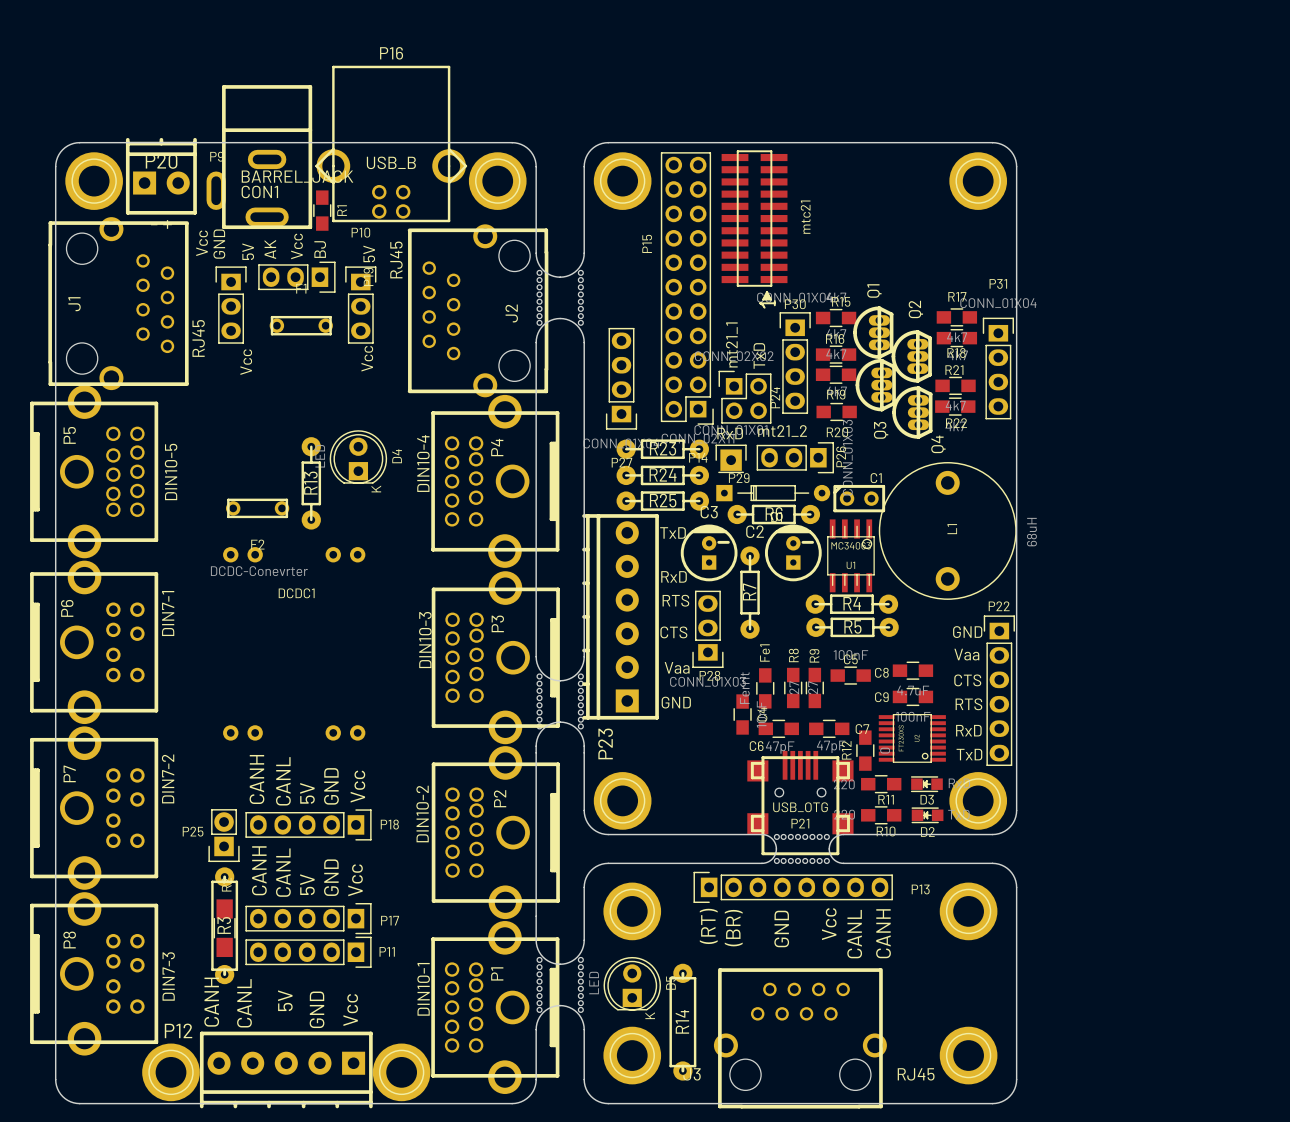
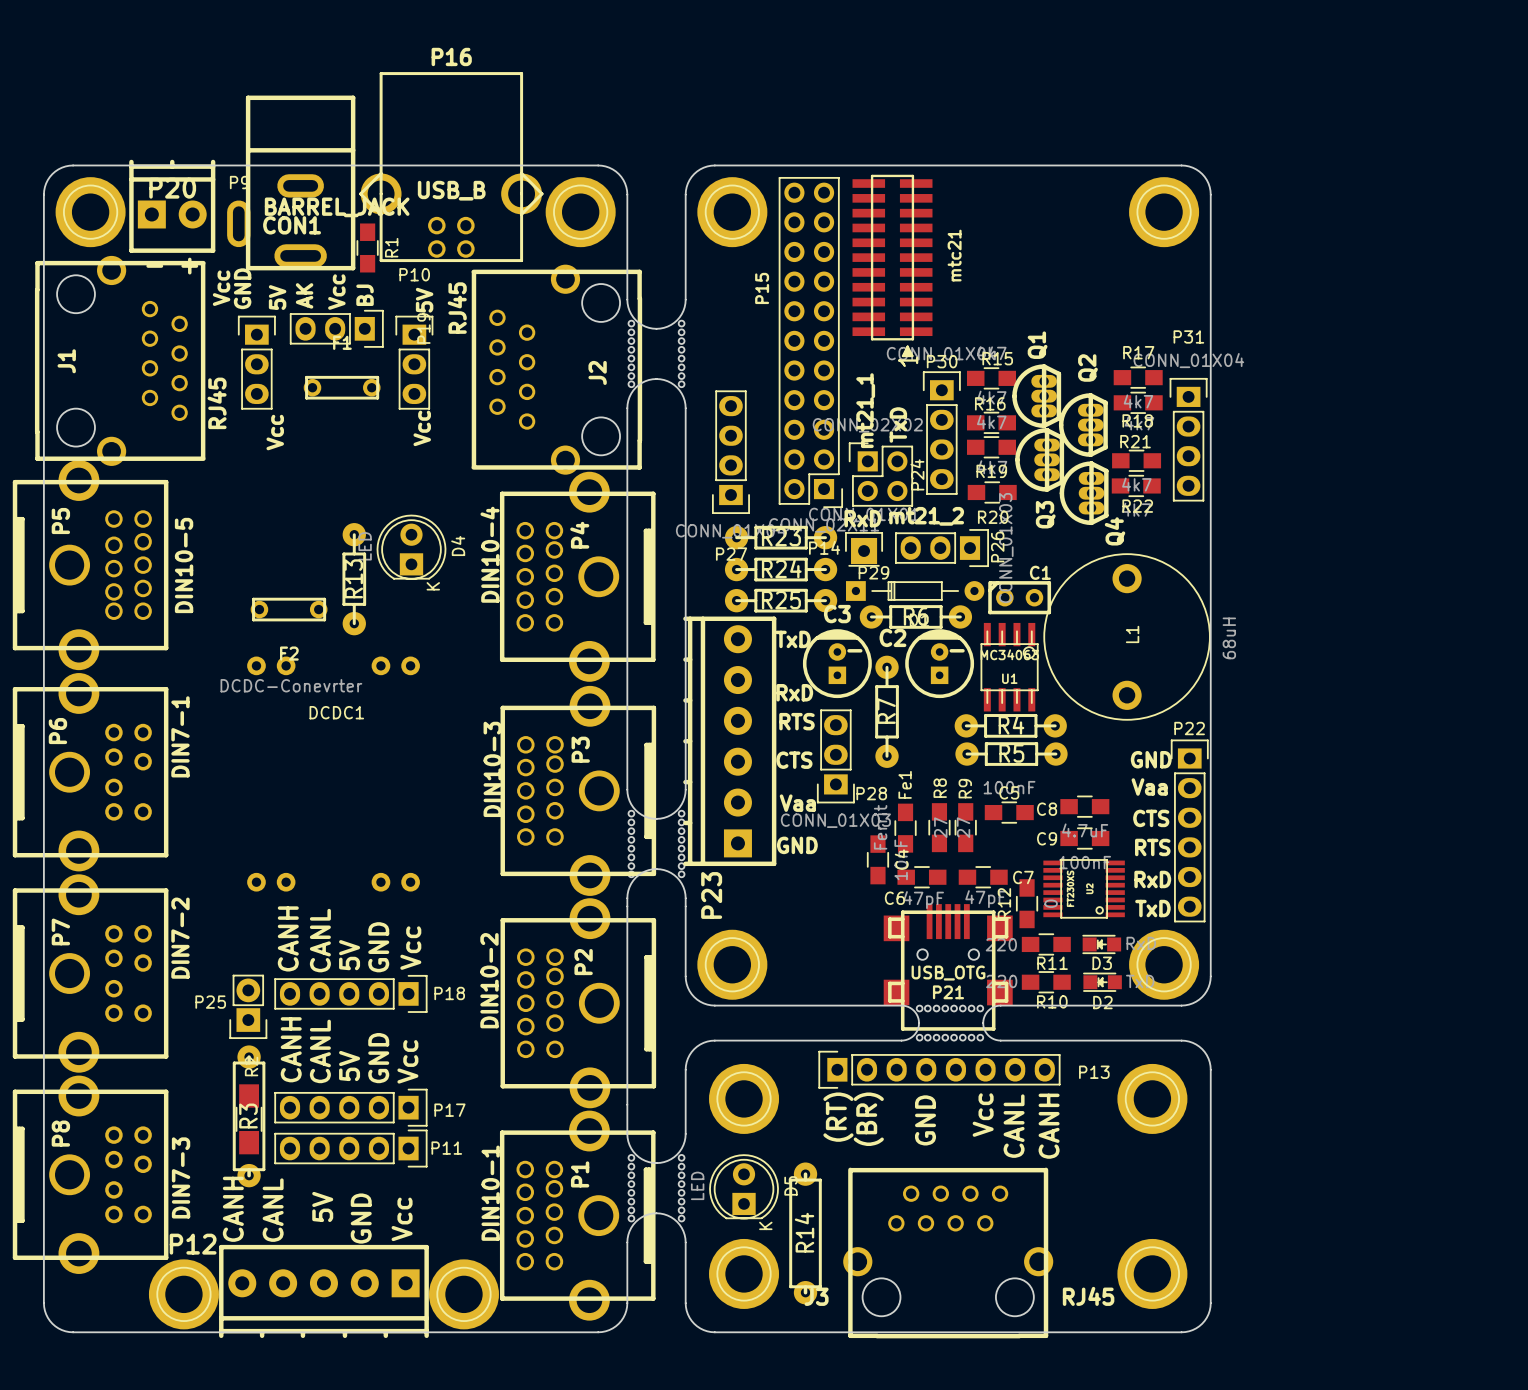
P28 name position: P28 (709, 675) -> P28 (871, 793)

